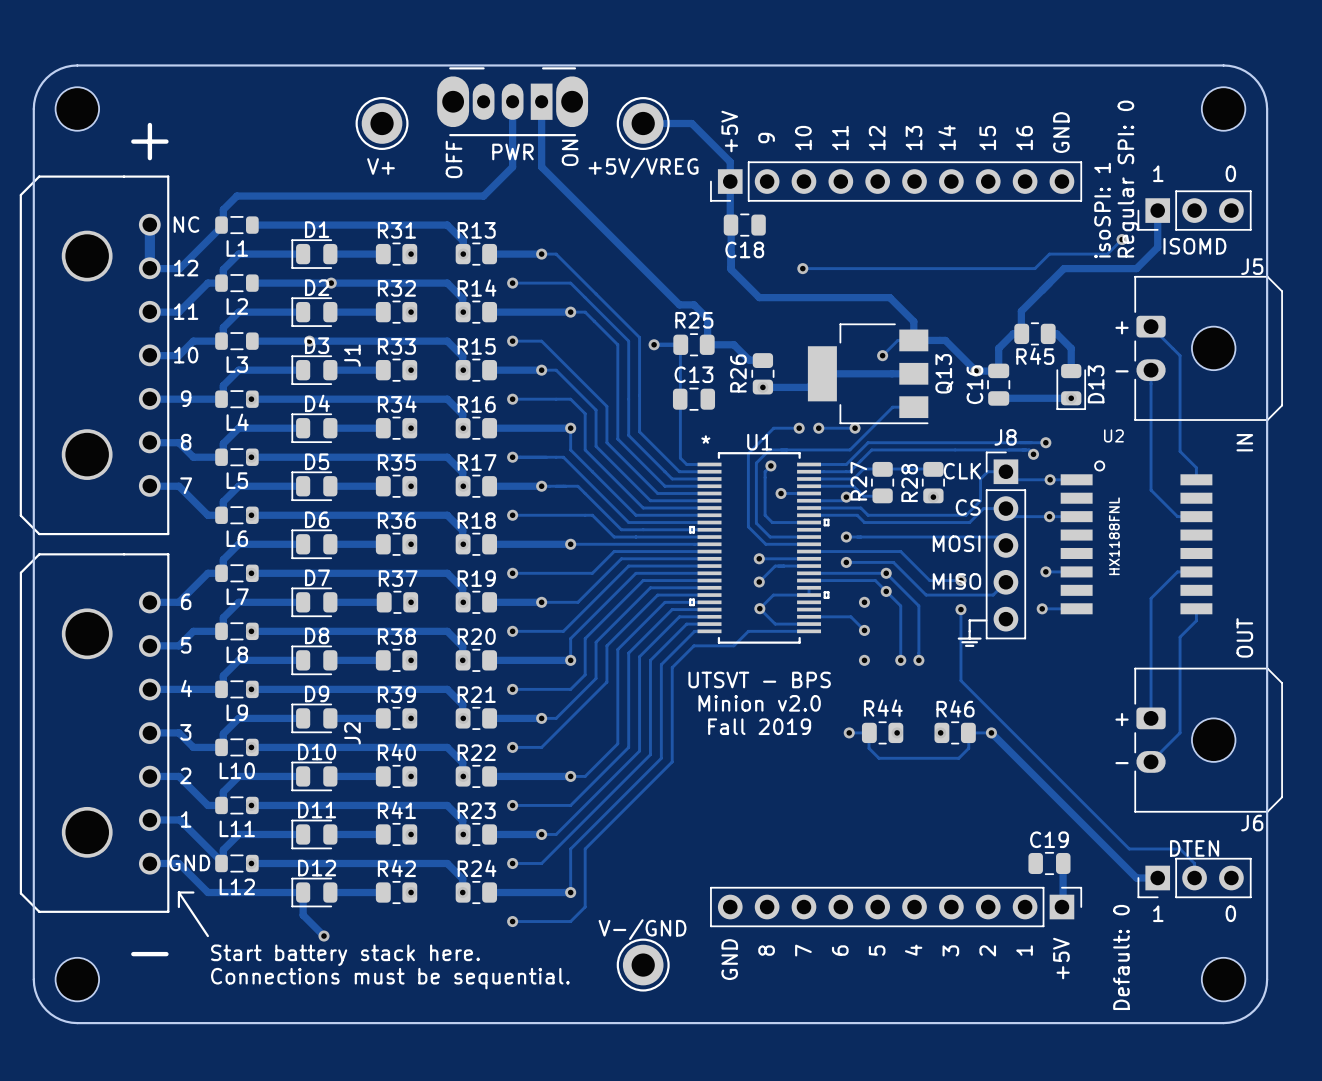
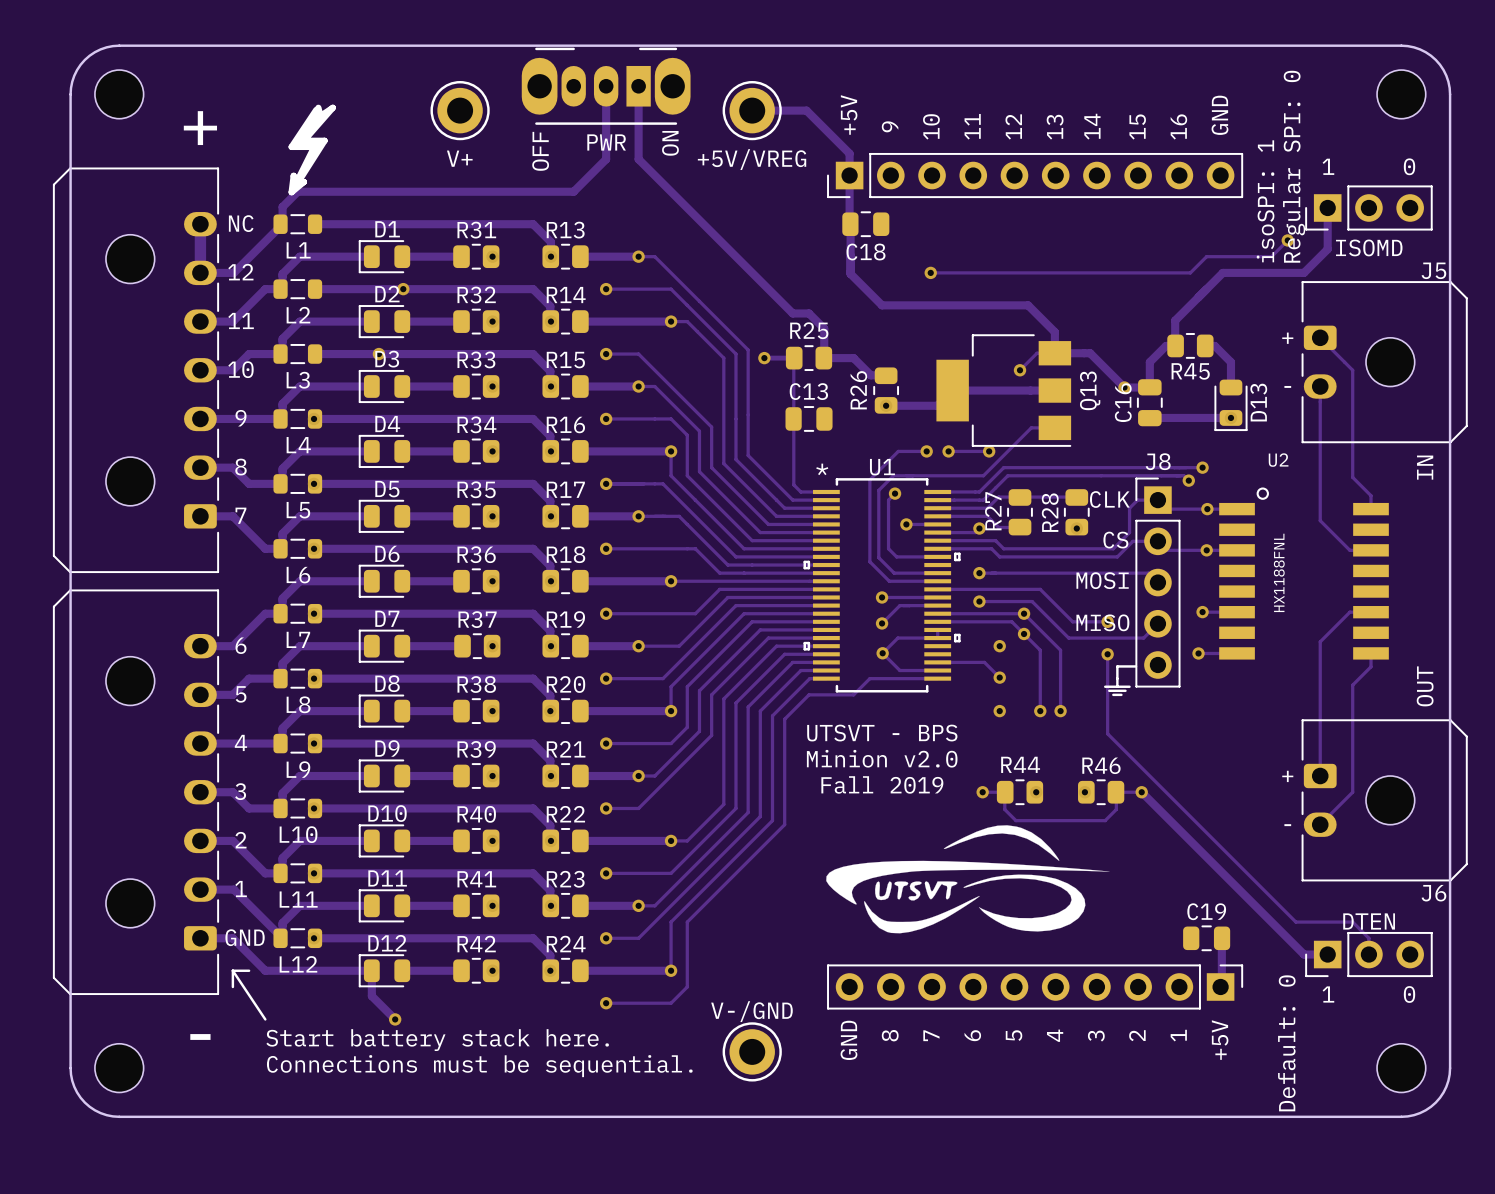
drawing: none -> [288, 104, 336, 196]
part: none -> (135, 370)
J1: (94, 355) -> none
part: none -> (135, 792)
J2: (94, 733) -> none
drawing: none -> [826, 825, 1110, 934]

